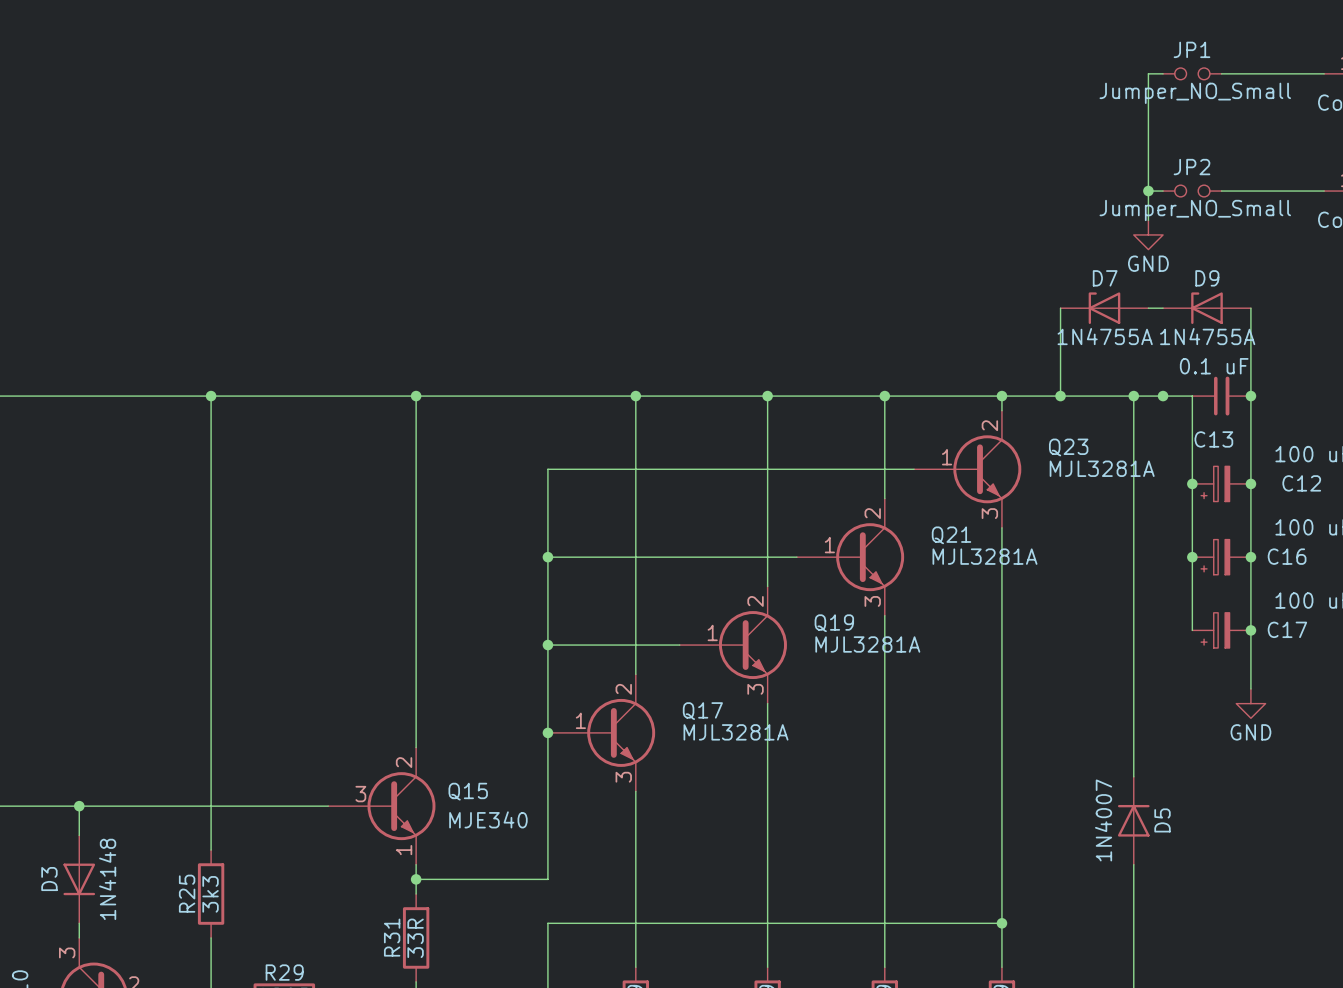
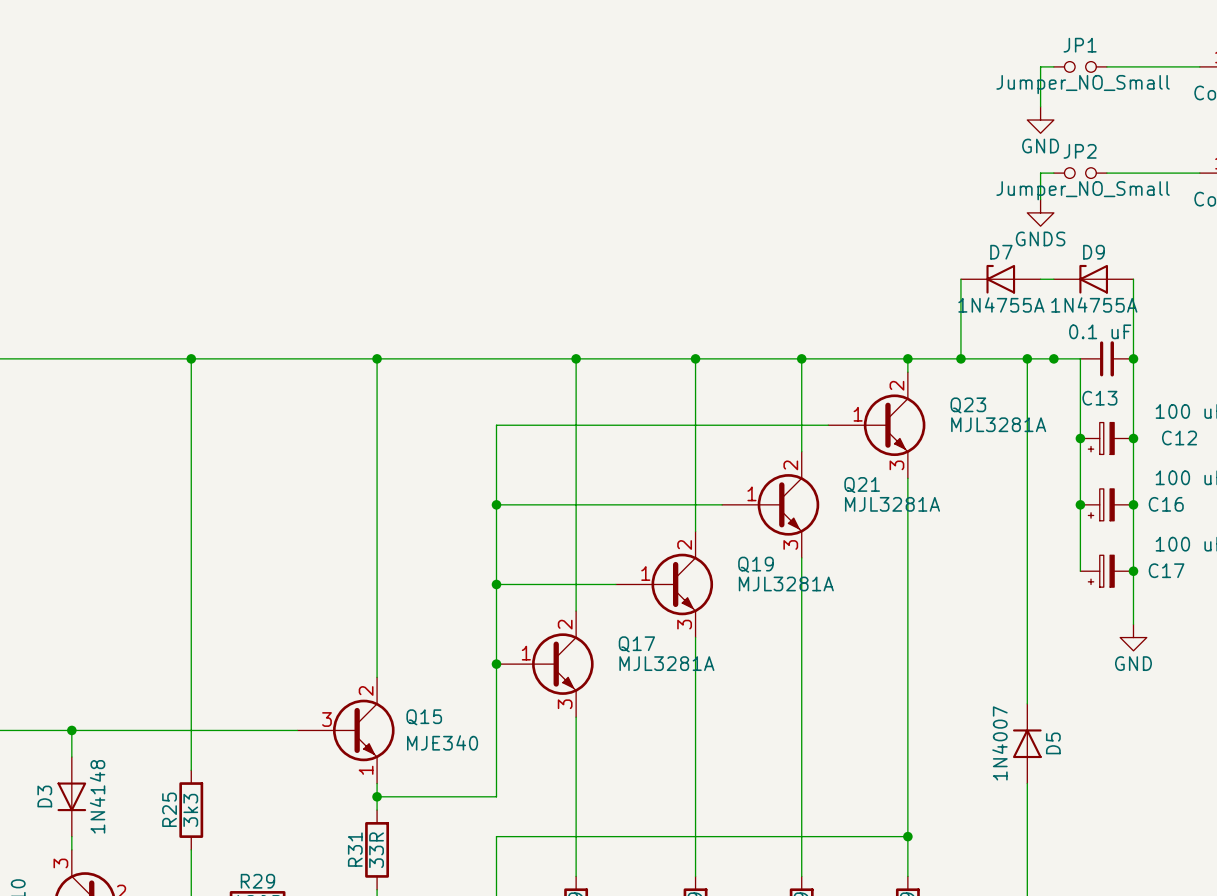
wire: (1148, 117) (1148, 191) -> none
power symbol: none -> GND (1040, 120)
junction: (1148, 191) -> none
power symbol: GND (1148, 234) -> GNDS (1040, 212)

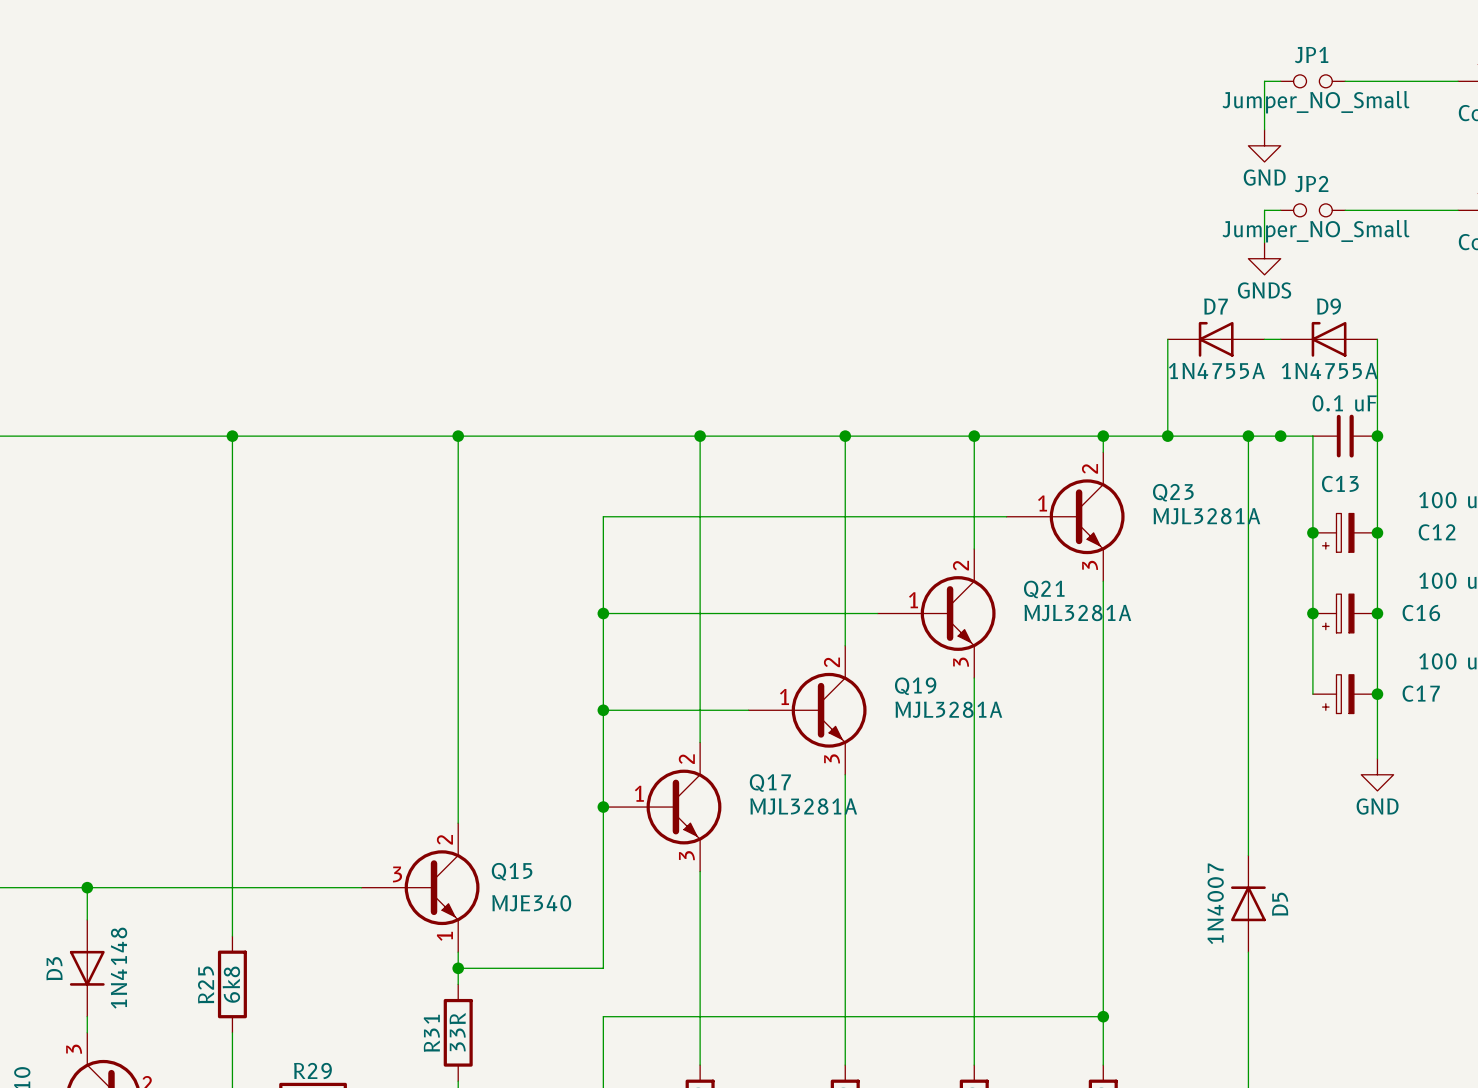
R25 value: 3k3 (190, 810) -> 6k8 (231, 984)

